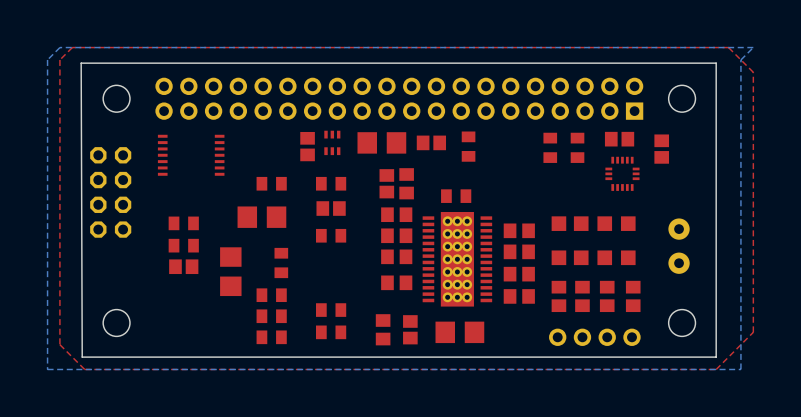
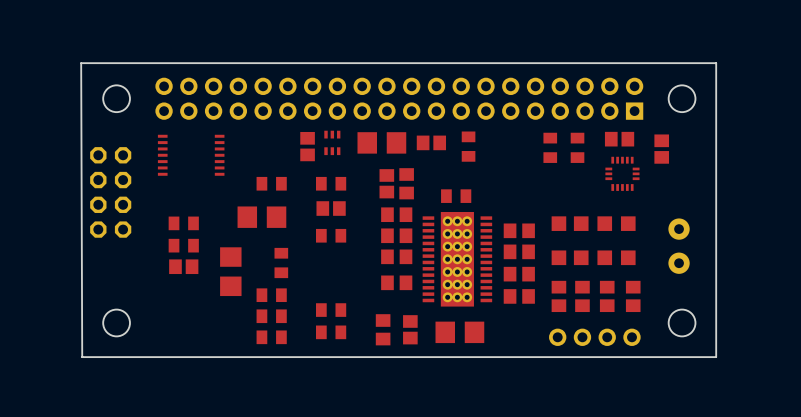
top zone outline: (728, 47) (72, 47) (59, 59) (59, 344) (84, 369) (716, 369) (753, 332) (753, 72) (728, 47) -> none
bottom zone outline: (753, 47) (59, 47) (47, 59) (47, 369) (740, 369) (740, 59) (753, 47) -> none

